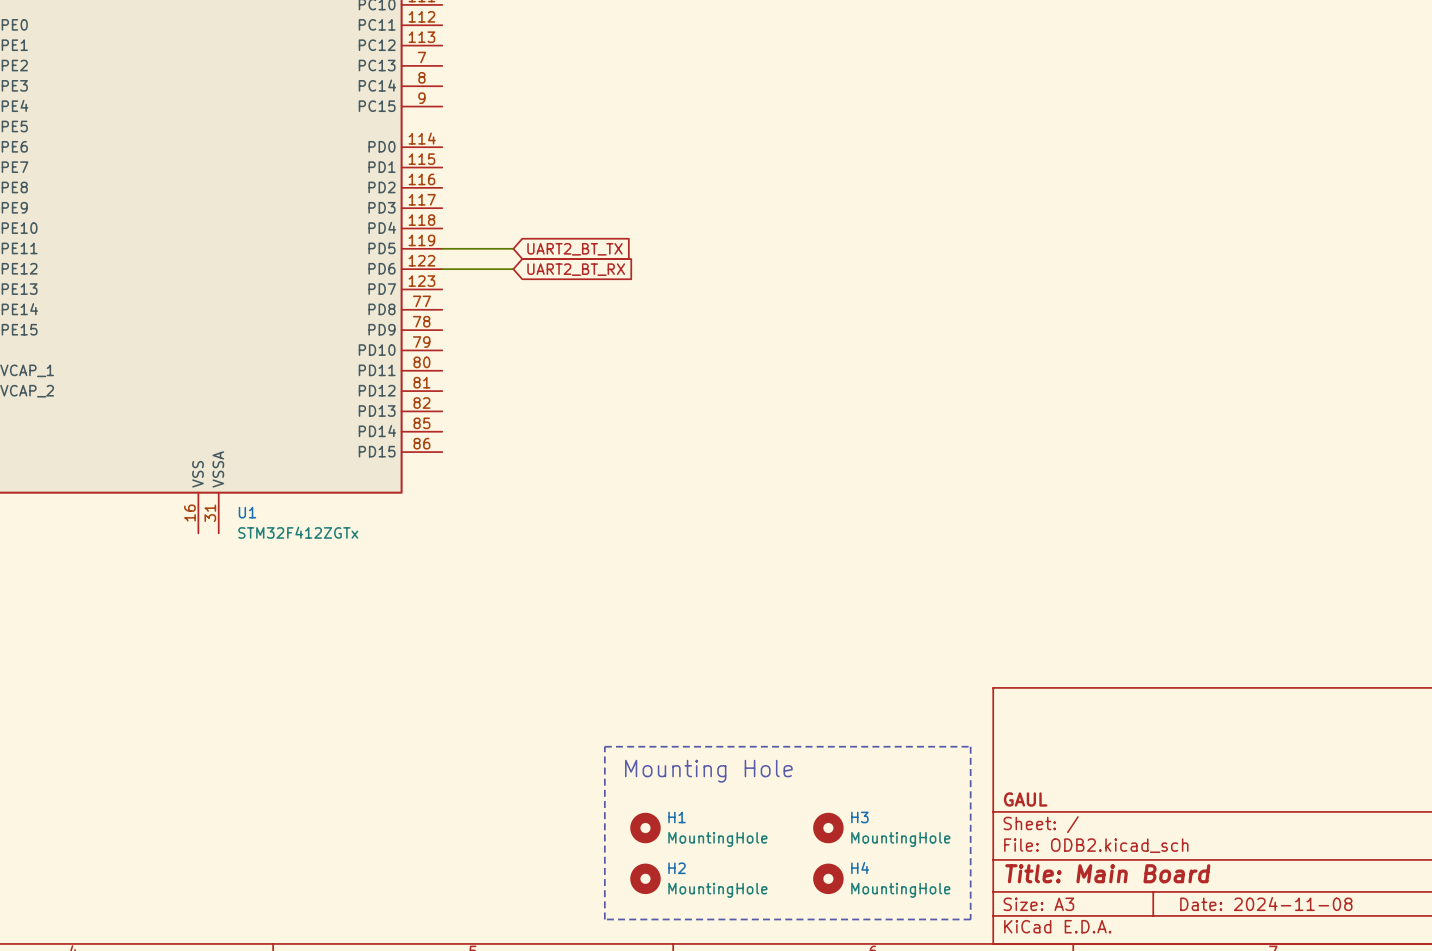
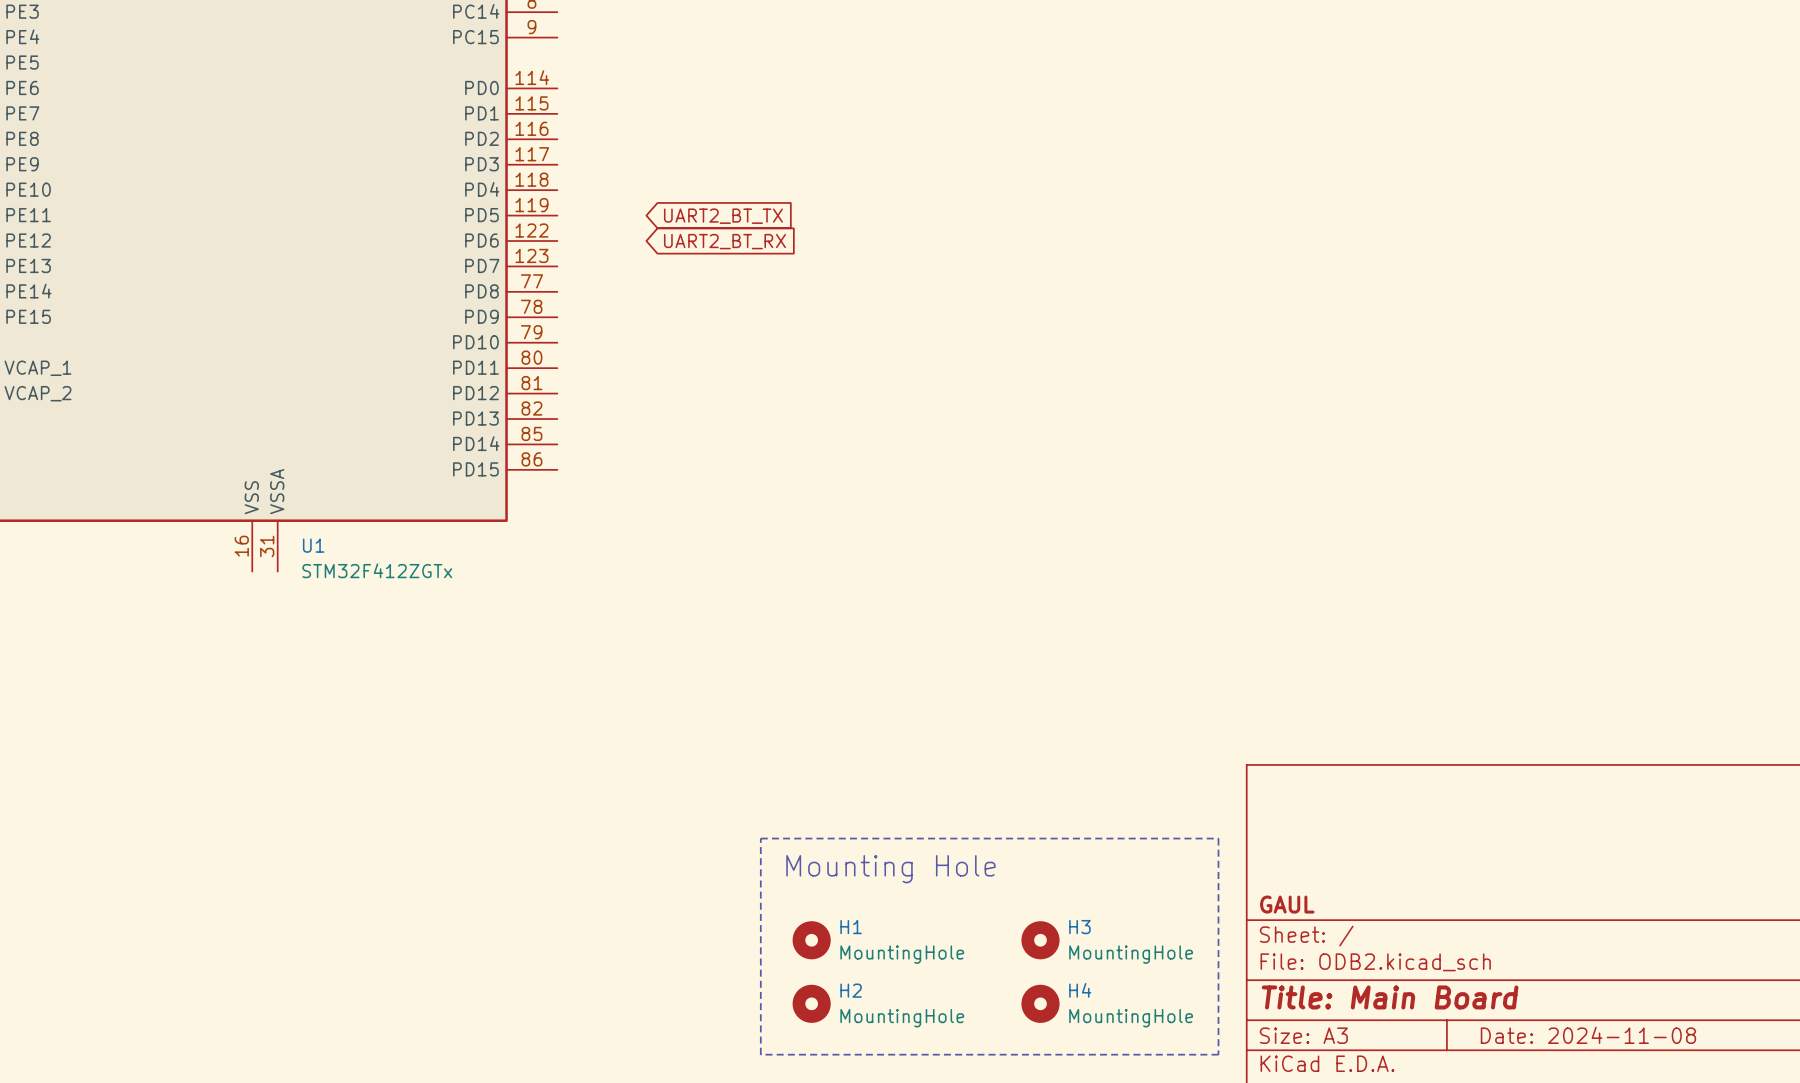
wire: (442, 248) (513, 248) -> none
wire: (442, 269) (513, 269) -> none

